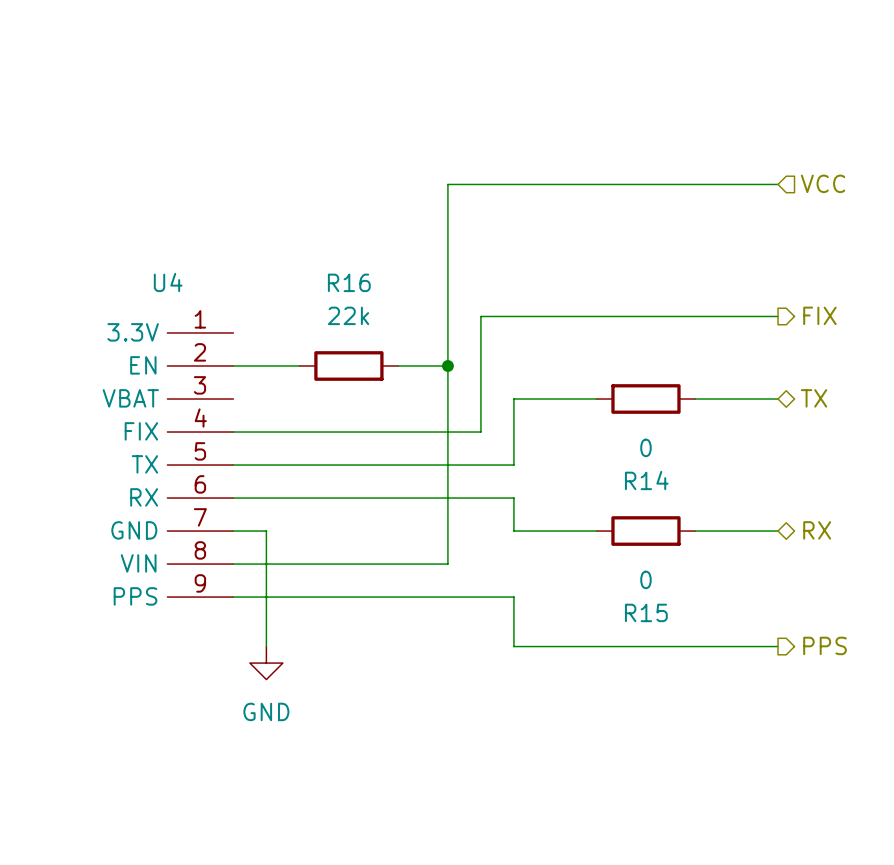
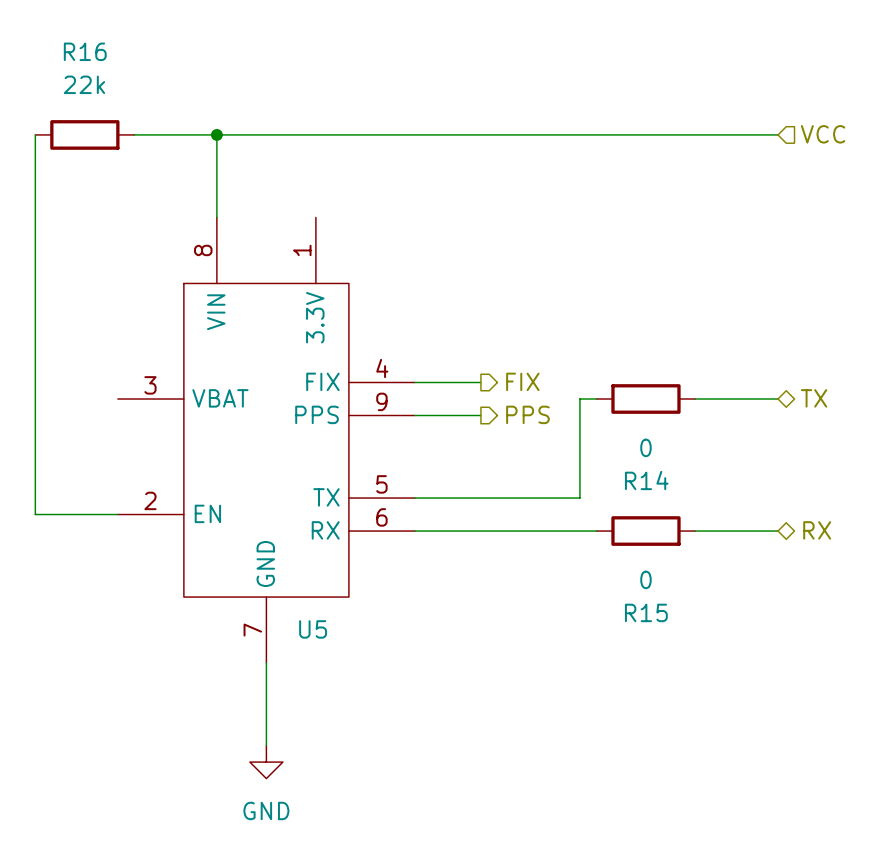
wire: none -> (35, 134) (35, 514) (117, 514)
wire: none -> (134, 134) (778, 134)
wire: none -> (216, 134) (216, 217)
junction: none -> (216, 134)
hierarchical label position: VCC (823, 183) -> VCC (823, 134)
wire: (778, 184) (447, 184) (447, 564) (233, 564) -> none
hierarchical label position: FIX (819, 315) -> FIX (522, 381)
wire: (778, 316) (480, 316) (480, 432) (233, 432) -> none
wire: (233, 365) (299, 365) -> (414, 382) (480, 382)
R16 position: (348, 365) -> (84, 134)
wire: (398, 365) (447, 365) -> none
junction: (447, 365) -> none
wire: (579, 399) (513, 399) (513, 465) (233, 465) -> (579, 399) (579, 498) (513, 498)
hierarchical label: none -> PPS (527, 414)
wire: none -> (414, 415) (480, 415)
U5: none -> (266, 440)
U4: (200, 465) -> none
wire: (233, 498) (414, 498) -> none
wire: (513, 498) (513, 531) -> (414, 531) (513, 531)
wire: (233, 531) (266, 531) (266, 646) -> none
wire: (233, 597) (513, 597) (513, 646) (778, 646) -> none
hierarchical label: PPS (825, 645) -> none
wire: none -> (266, 663) (266, 745)
power symbol position: GND (266, 663) -> GND (266, 762)

